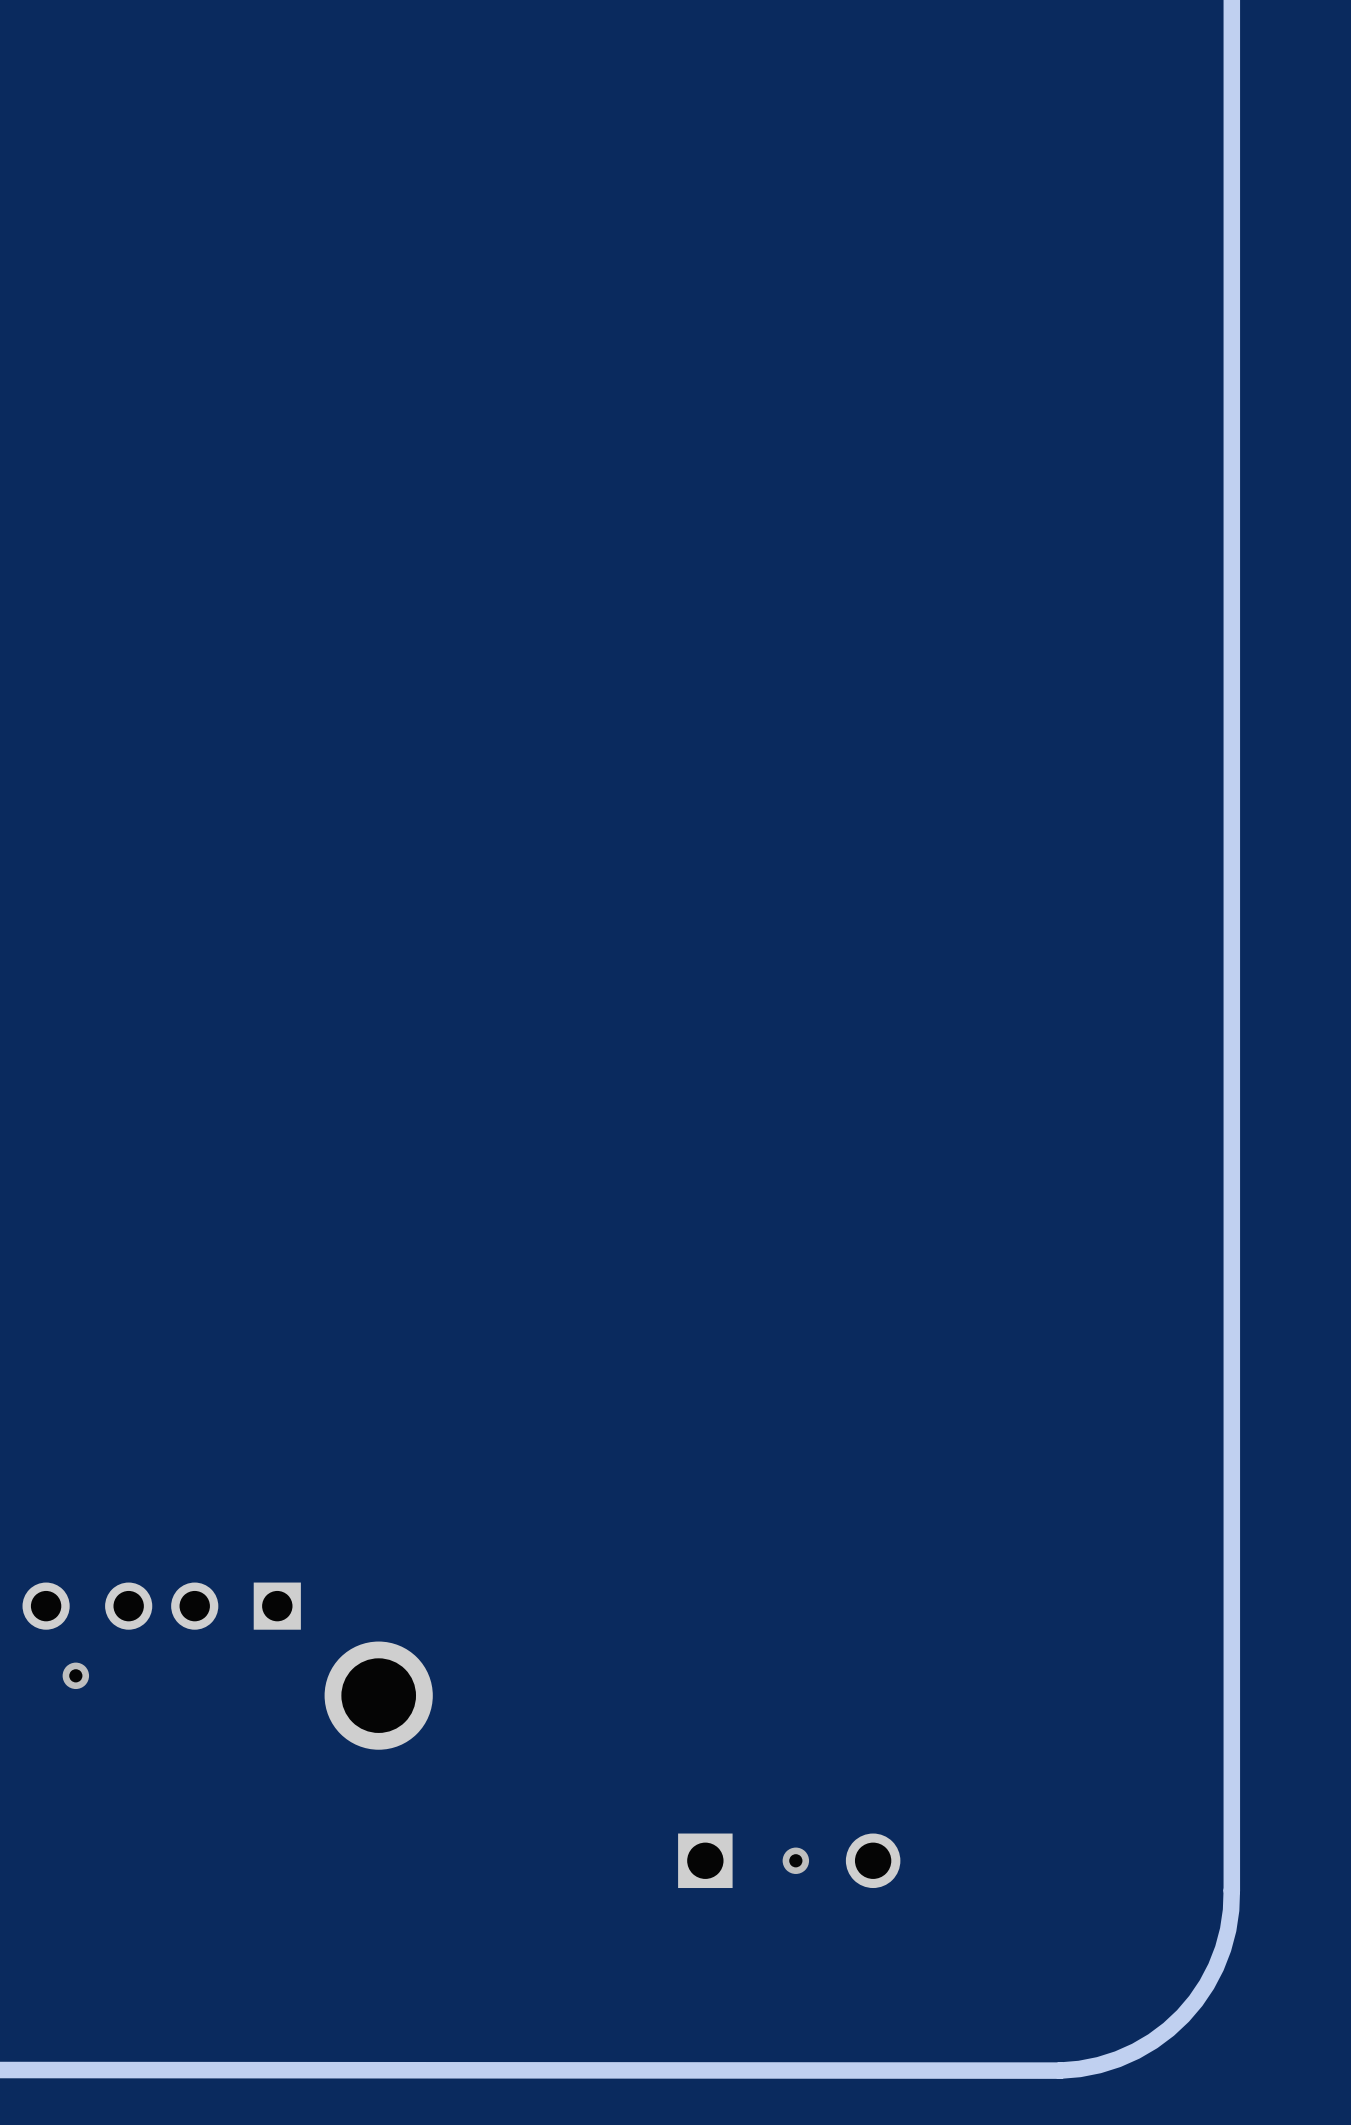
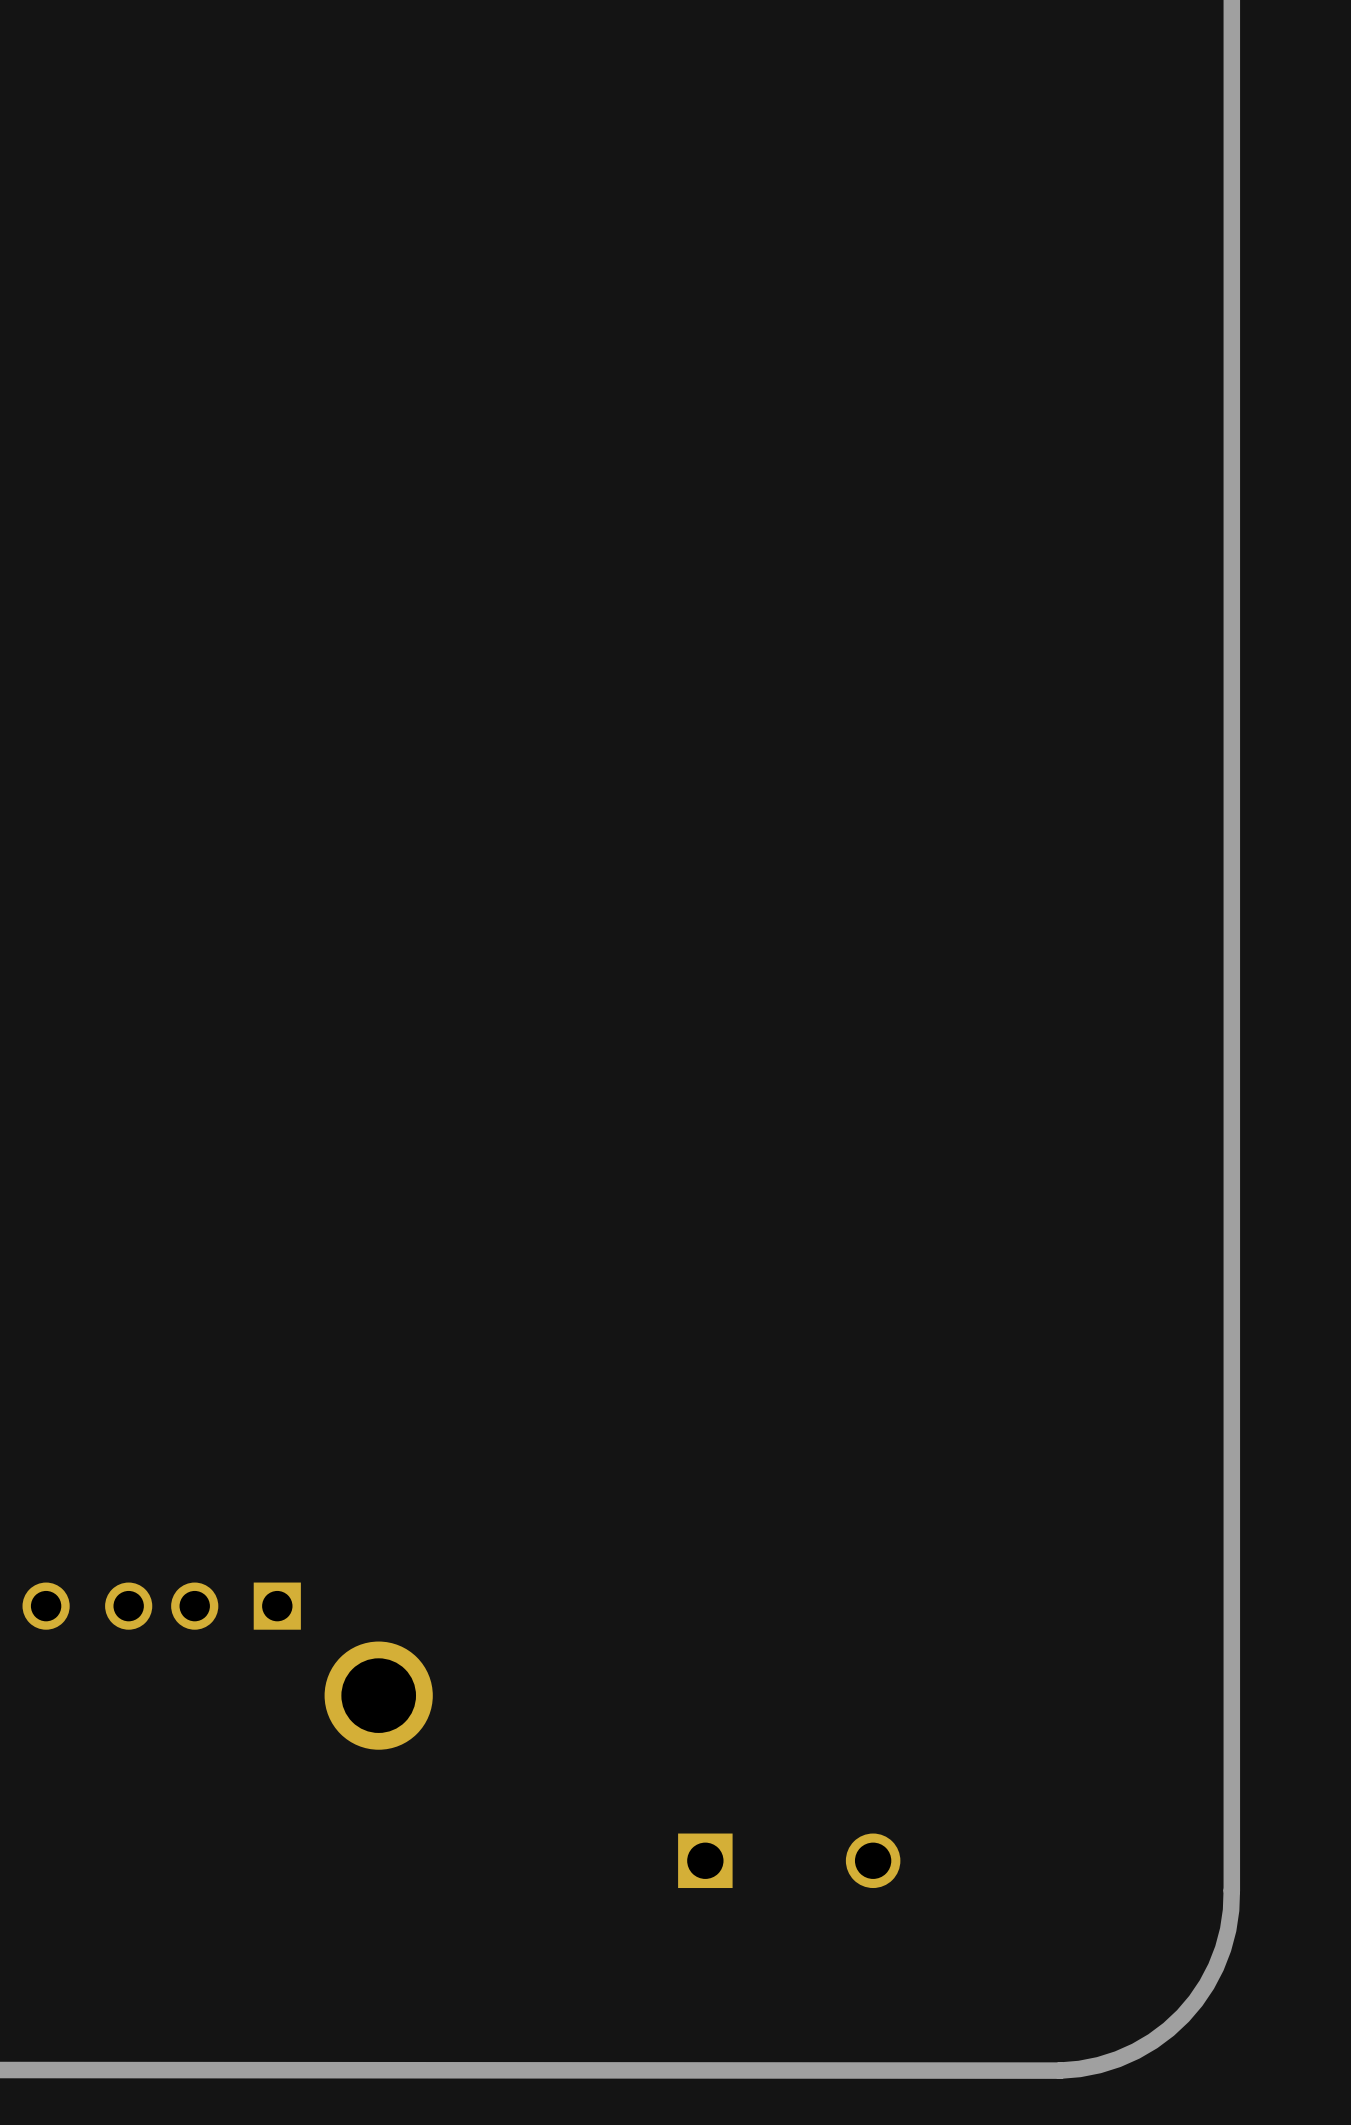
via: (75, 1675) -> none
via: (795, 1860) -> none

